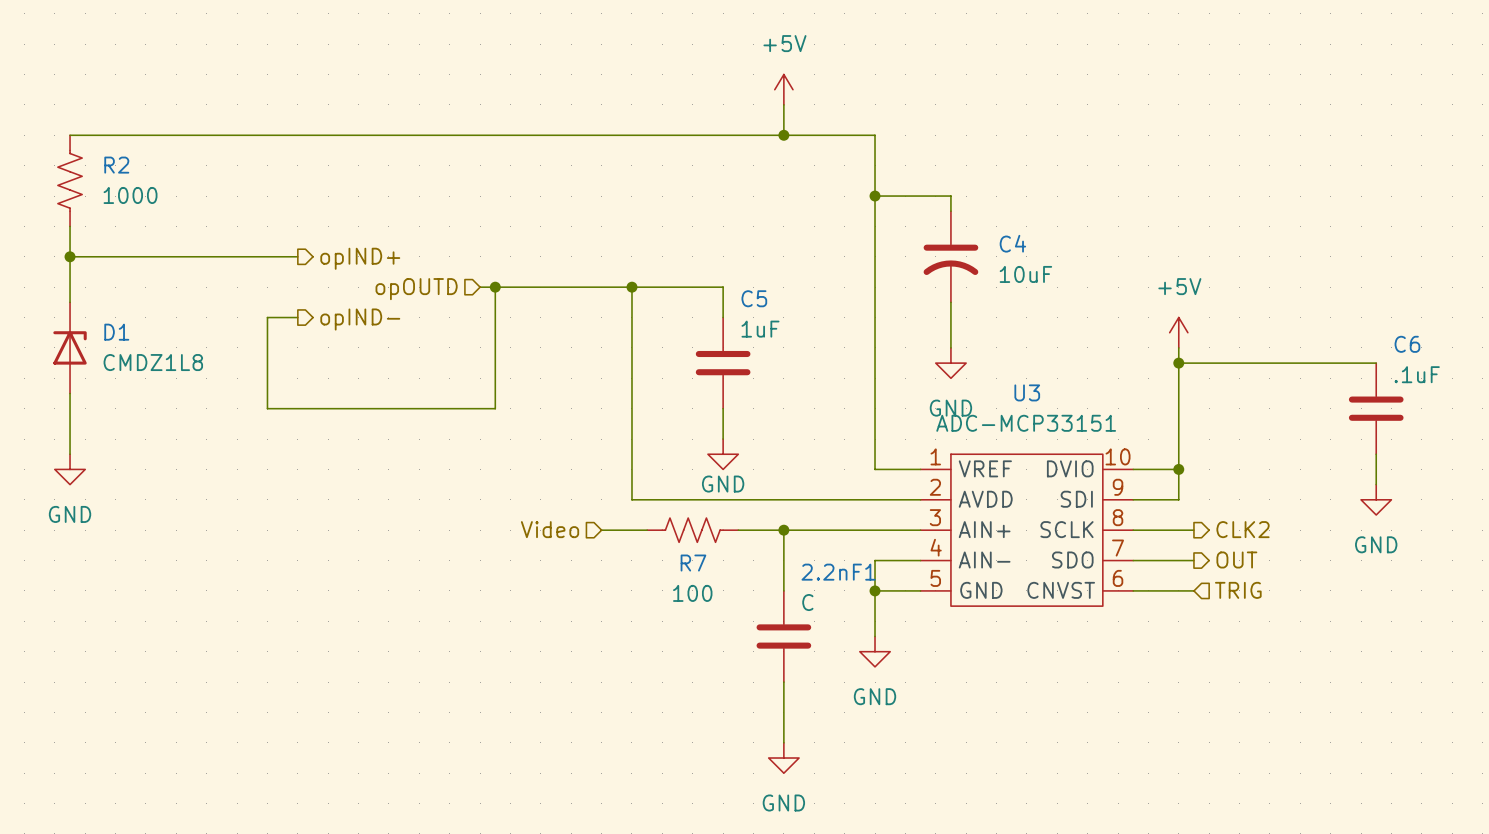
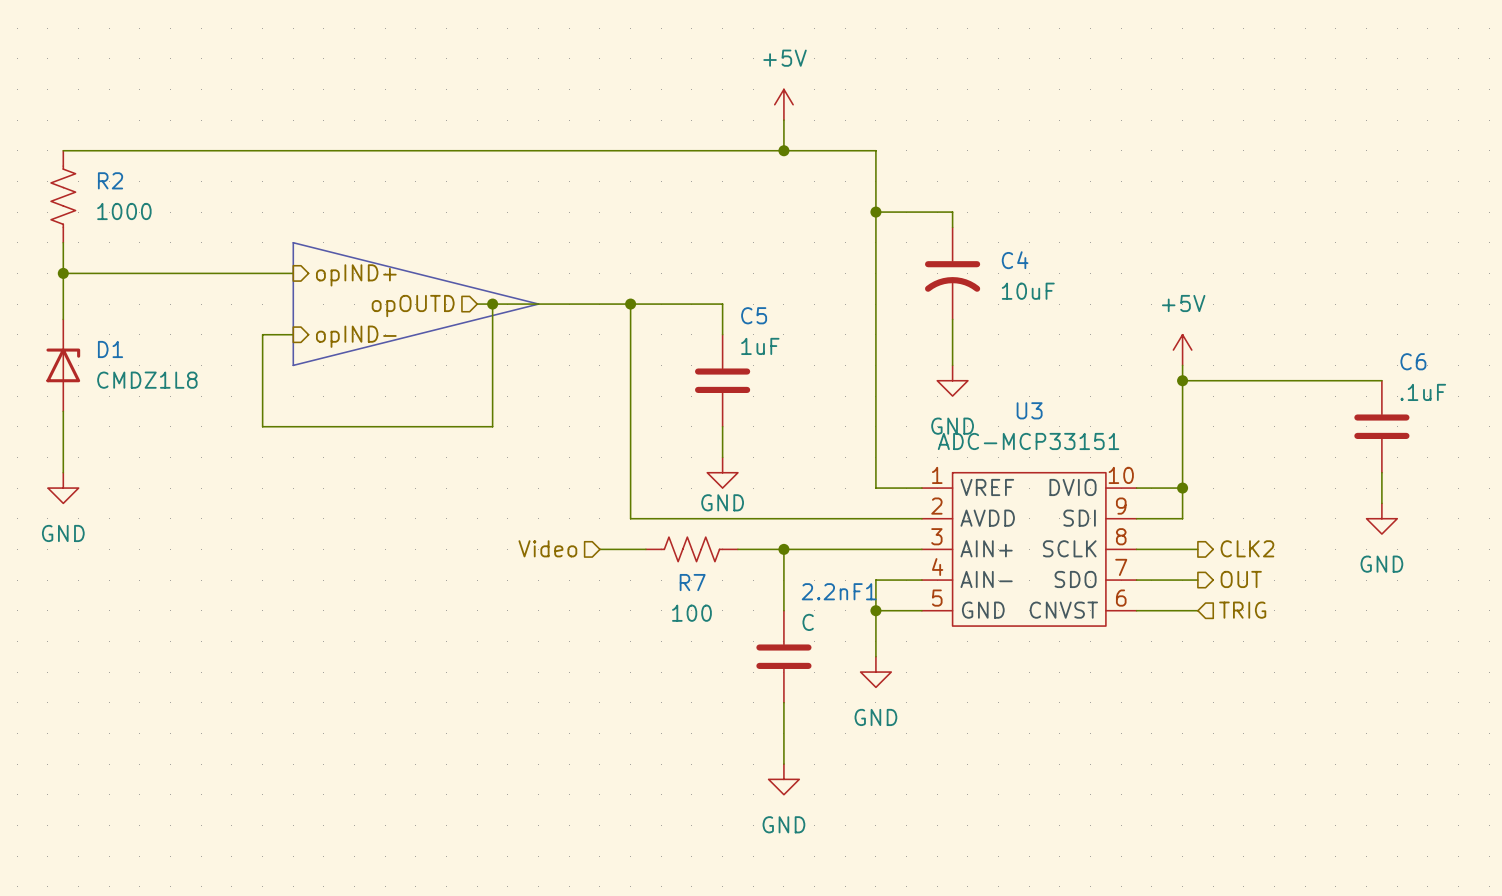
line: none -> (293, 242) (535, 303) (538, 304) (293, 365) (293, 242)

